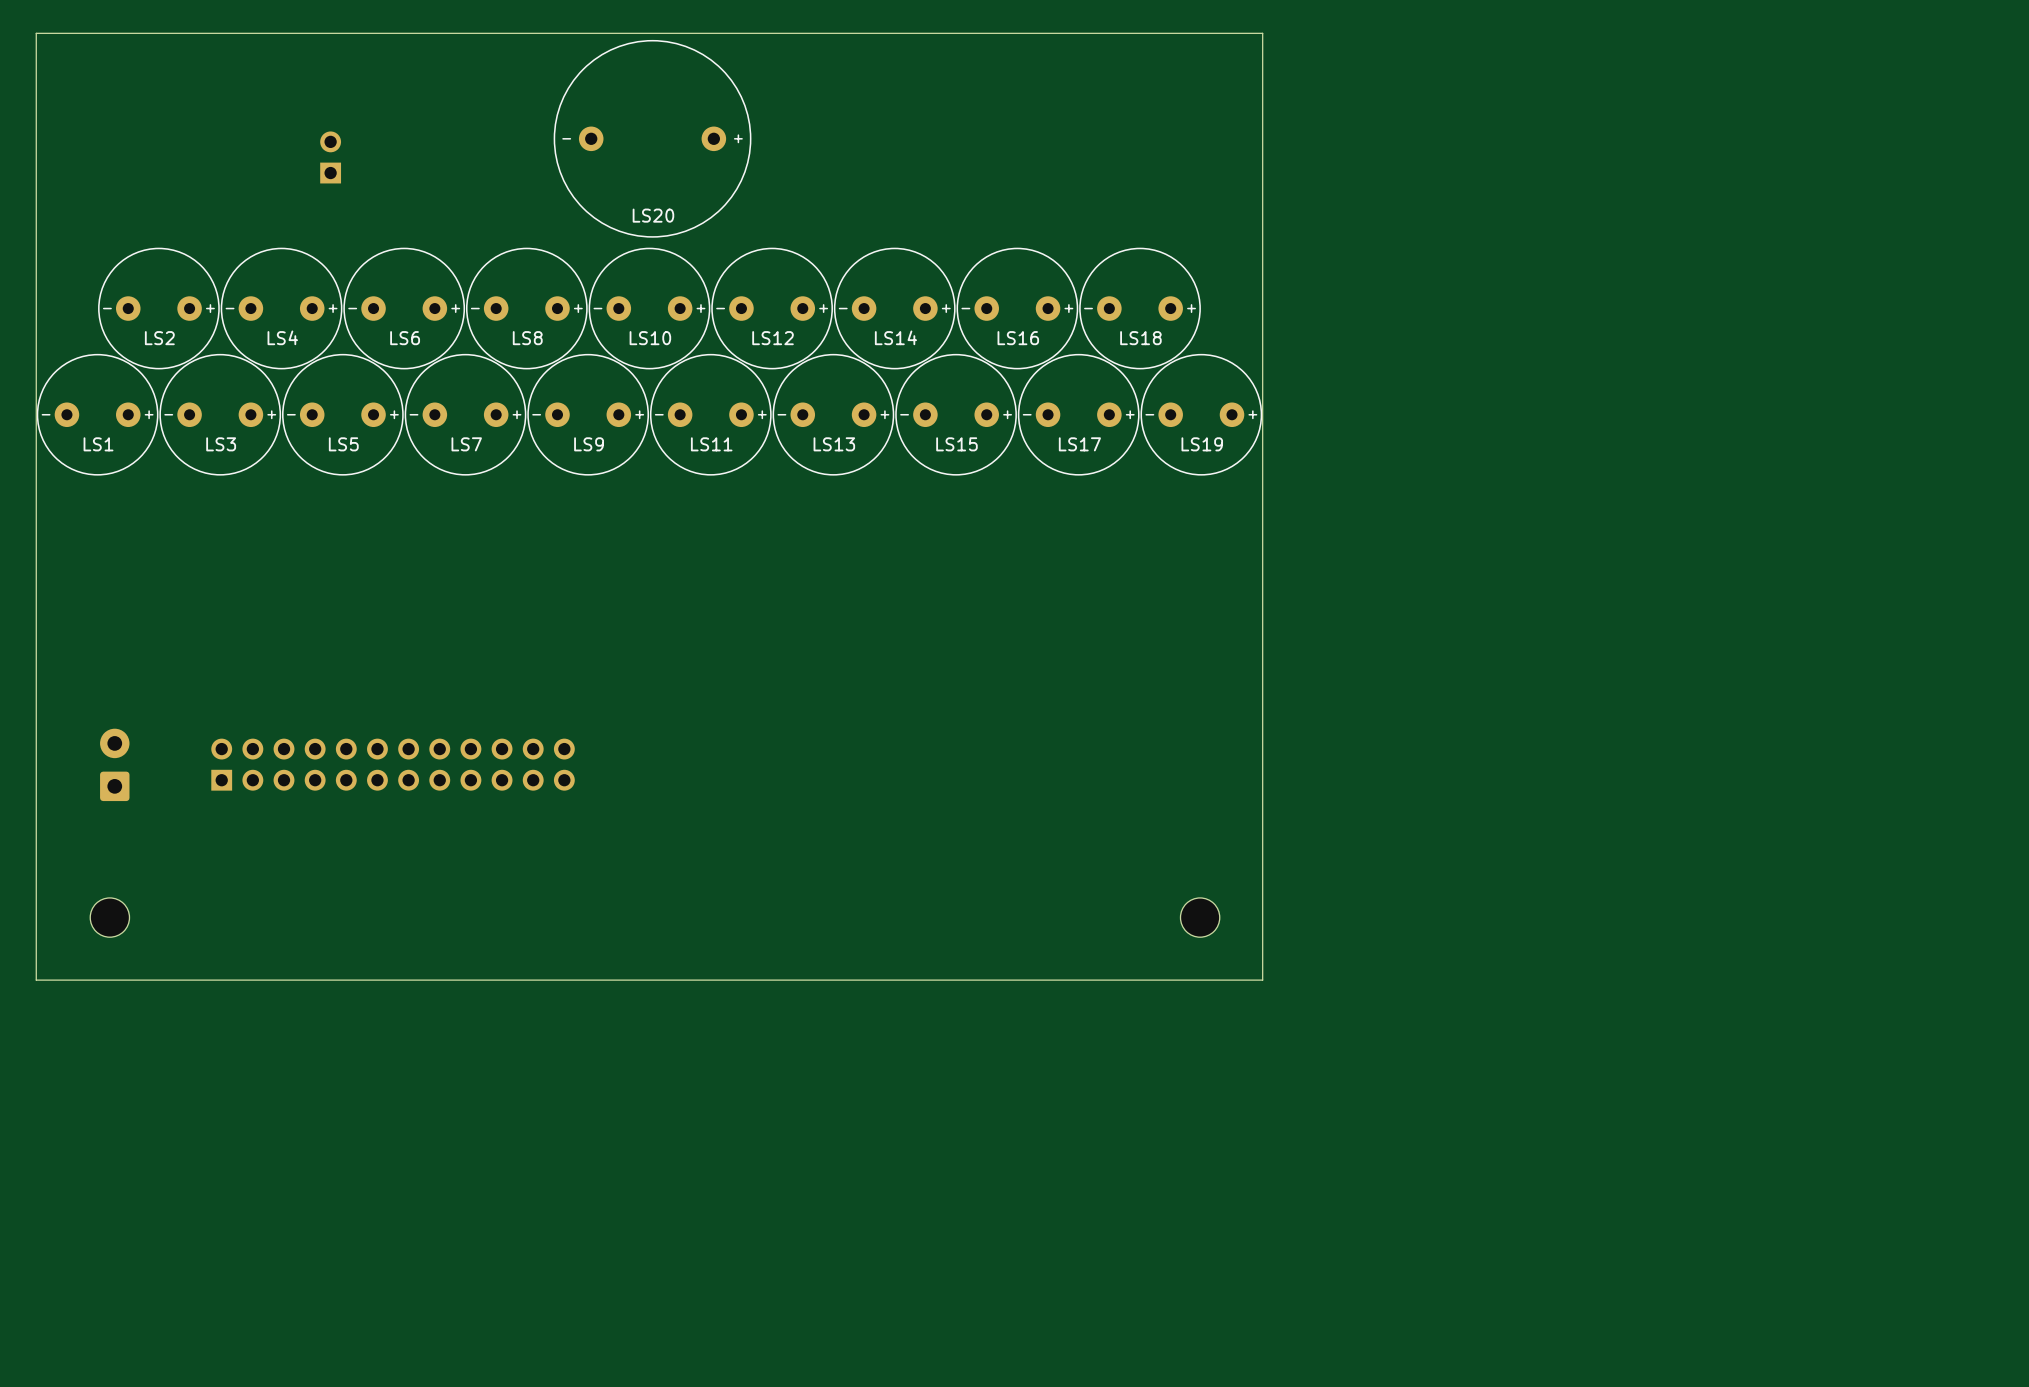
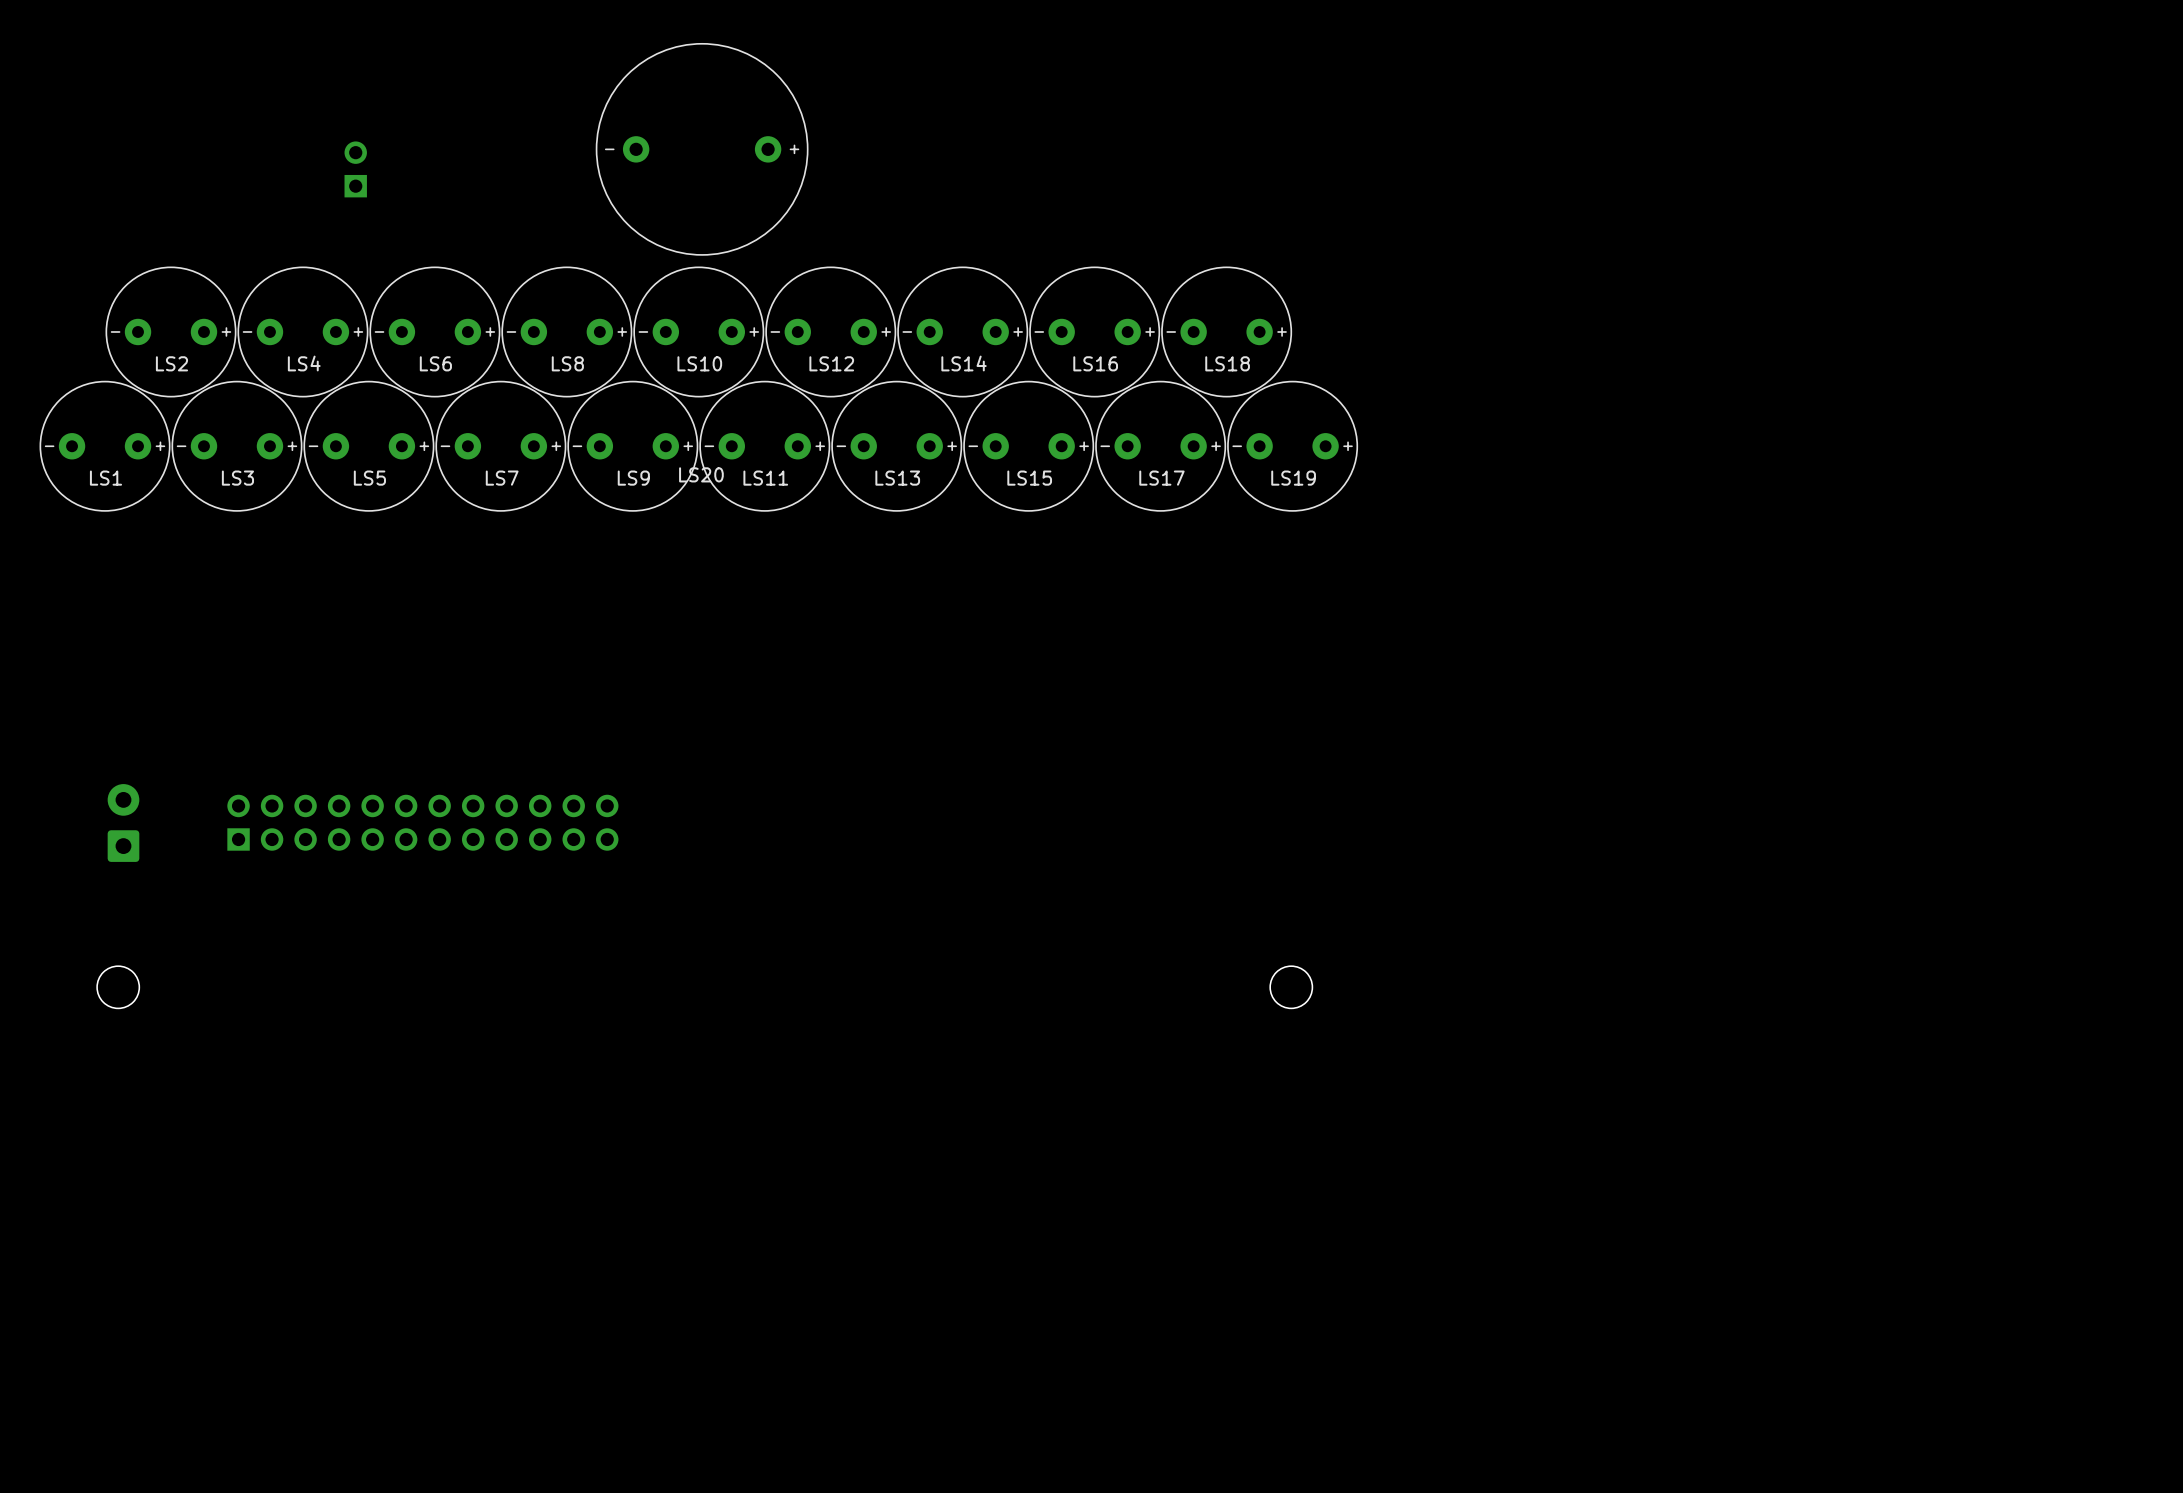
board edge: (1262, 33) (36, 33) (36, 980) (1262, 980) (1262, 33) -> none
LS20 name position: LS20 (653, 215) -> LS20 (701, 474)

